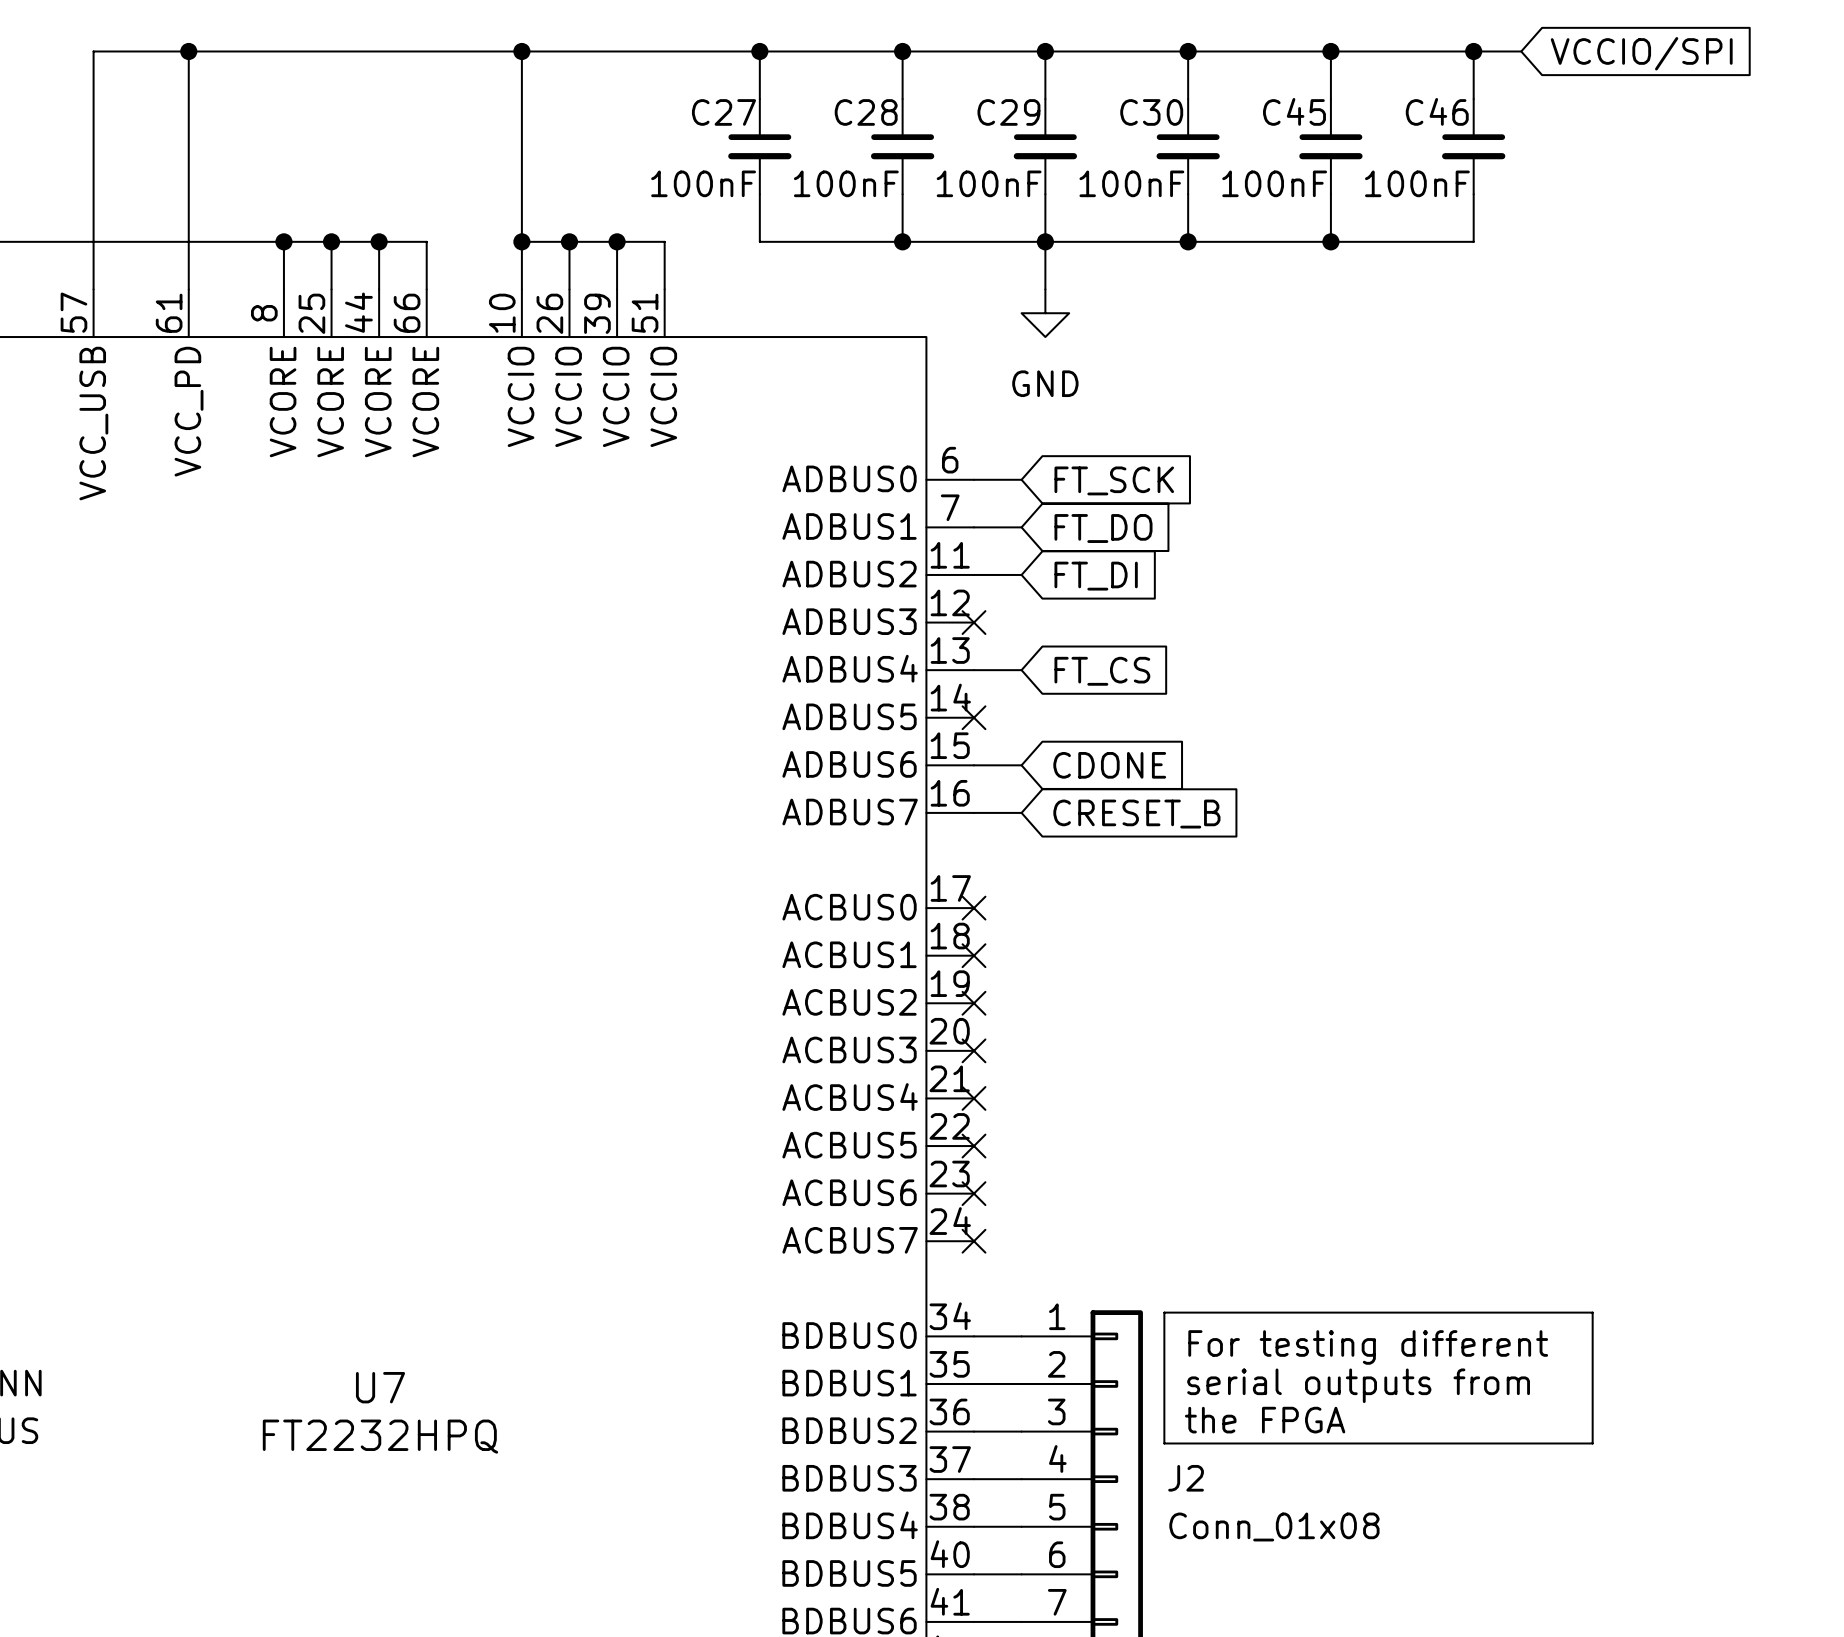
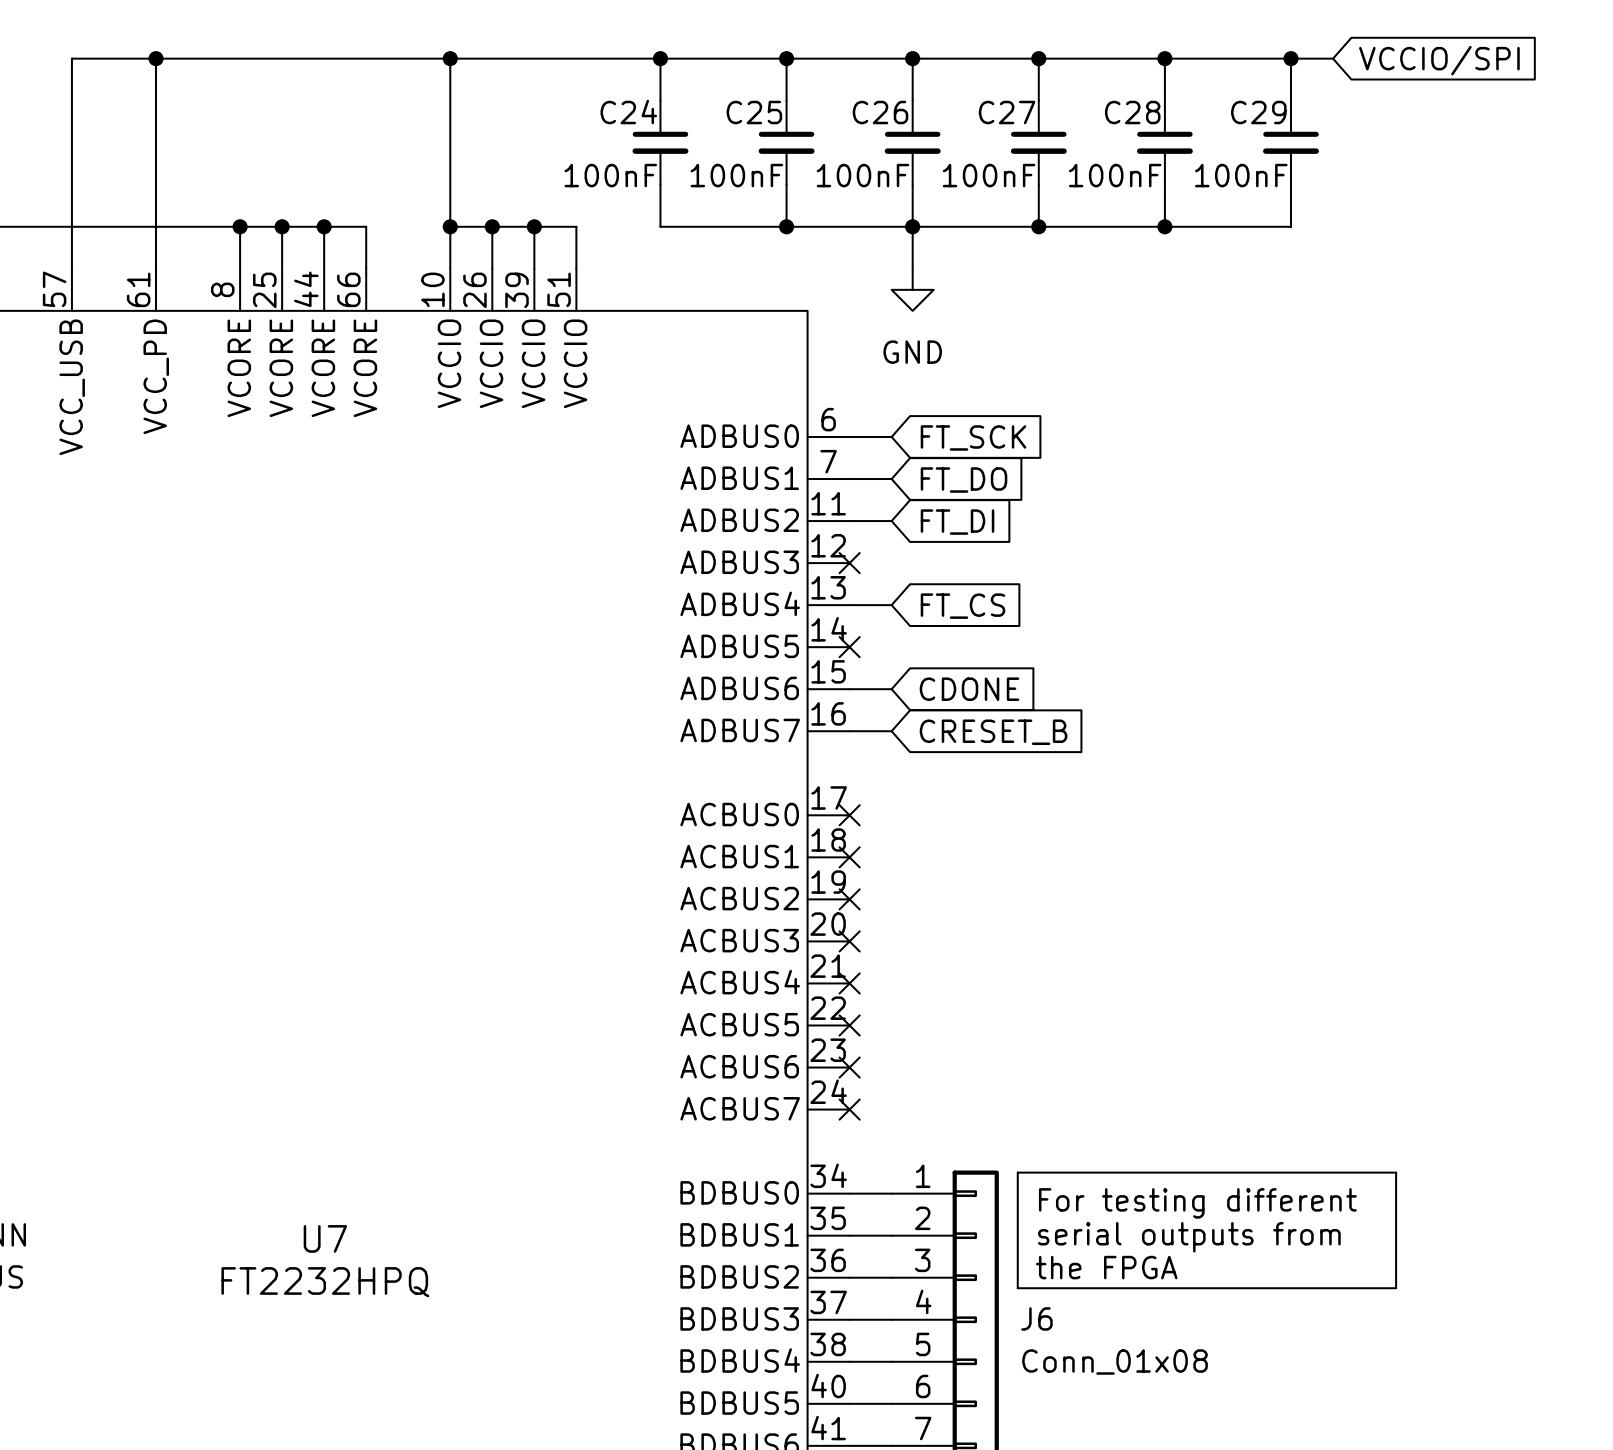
C45 name: C45 (1294, 111) -> C28 (1132, 112)
C46 name: C46 (1437, 111) -> C29 (1258, 112)
C27 name: C27 (723, 112) -> C24 (628, 112)
C28 name: C28 (866, 112) -> C25 (754, 112)
C29 name: C29 (1008, 112) -> C26 (880, 112)
C30 name: C30 (1151, 112) -> C27 (1007, 112)
J2 name: J2 (1186, 1478) -> J6 (1036, 1318)

